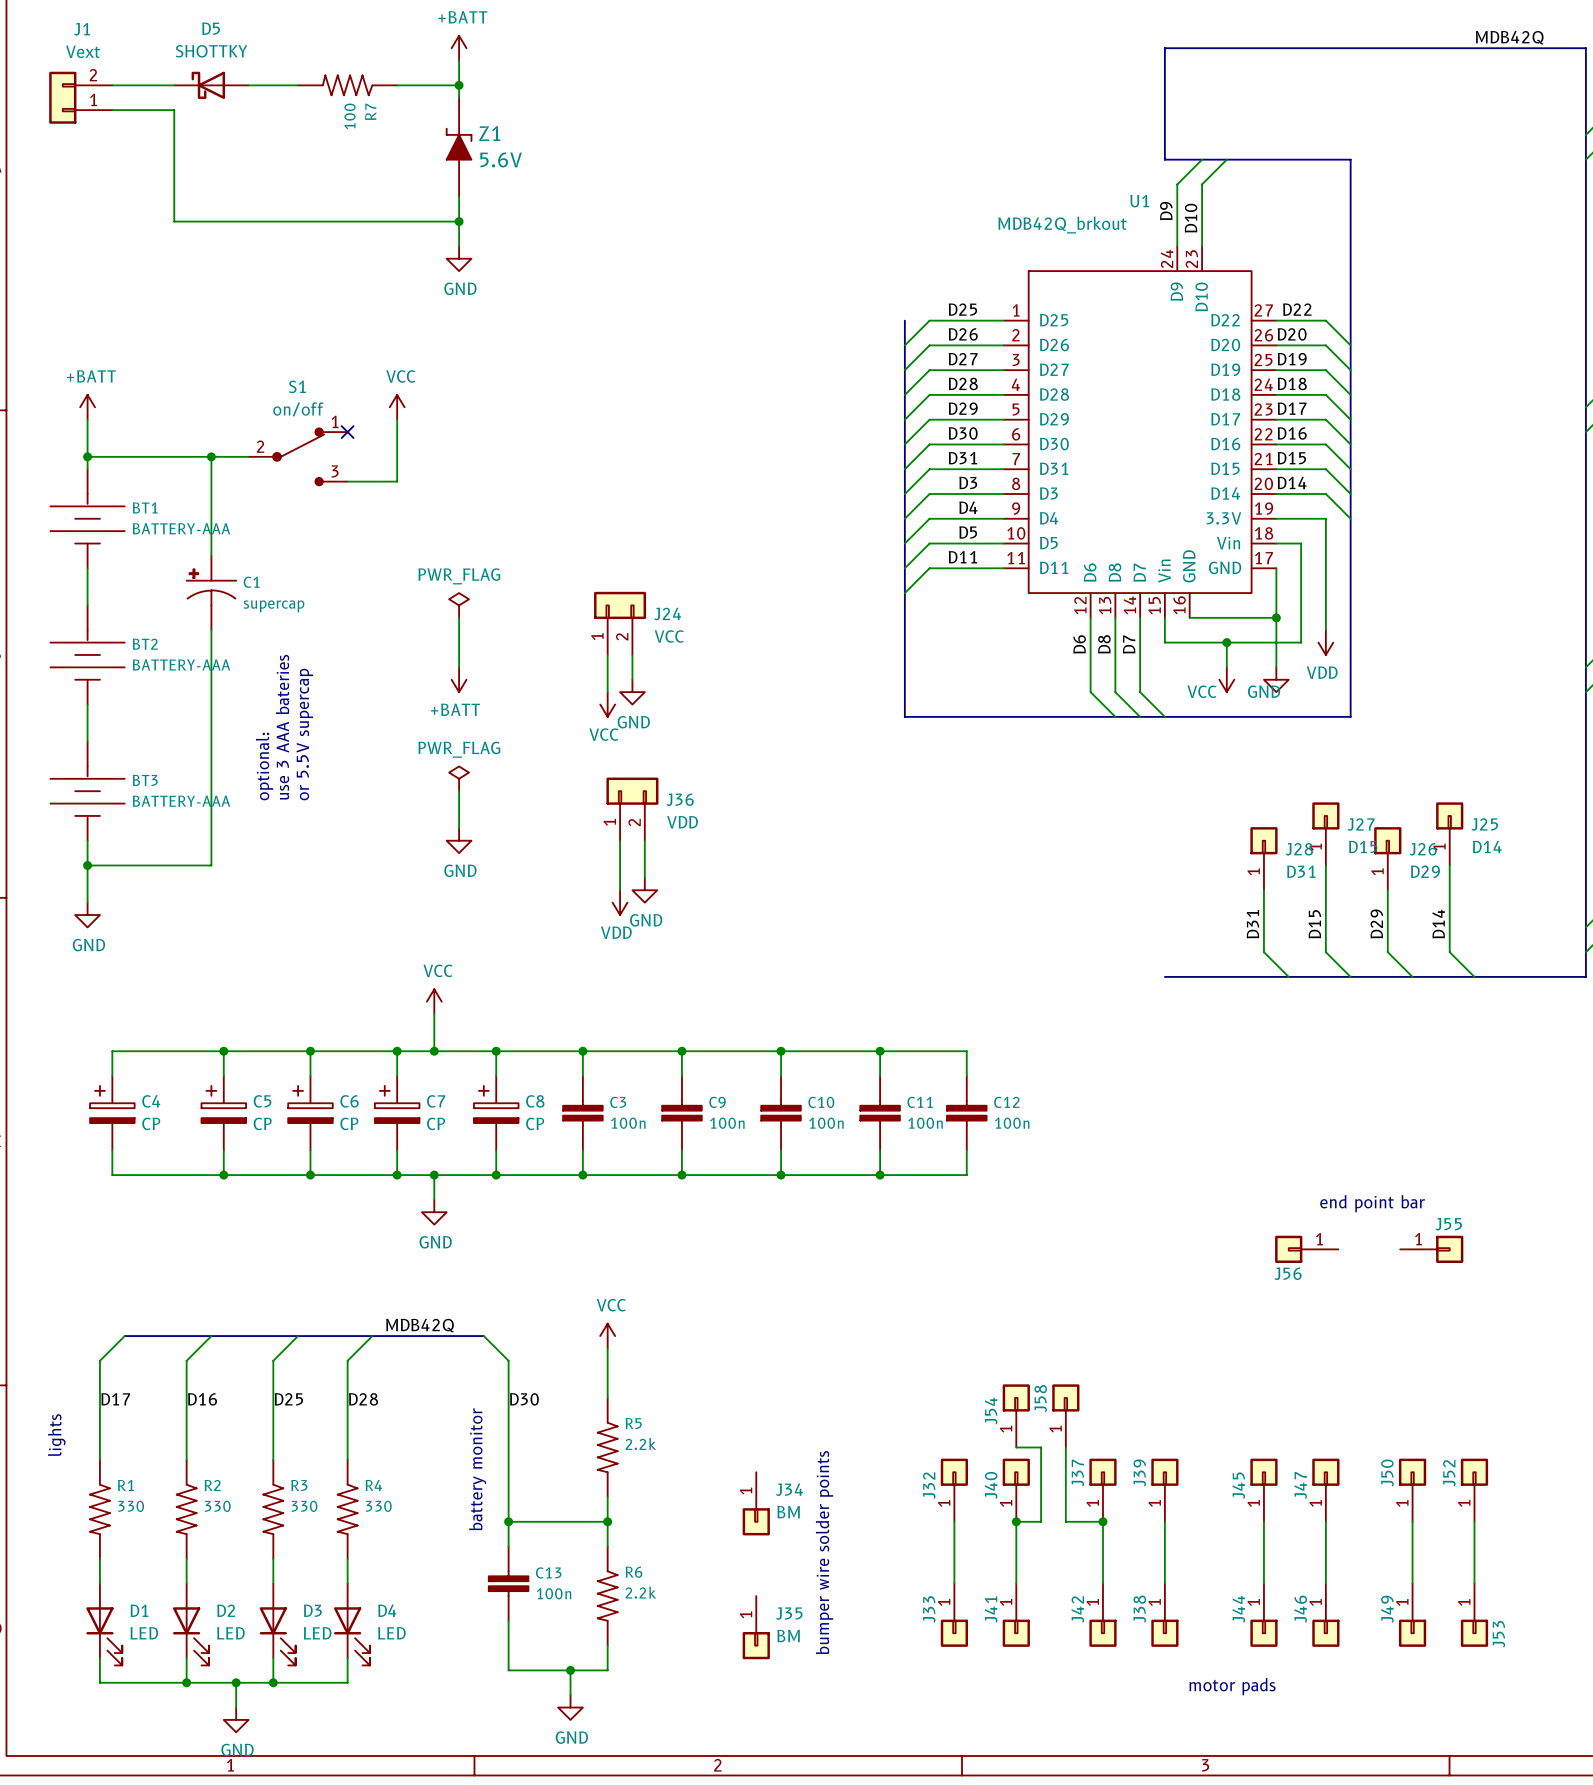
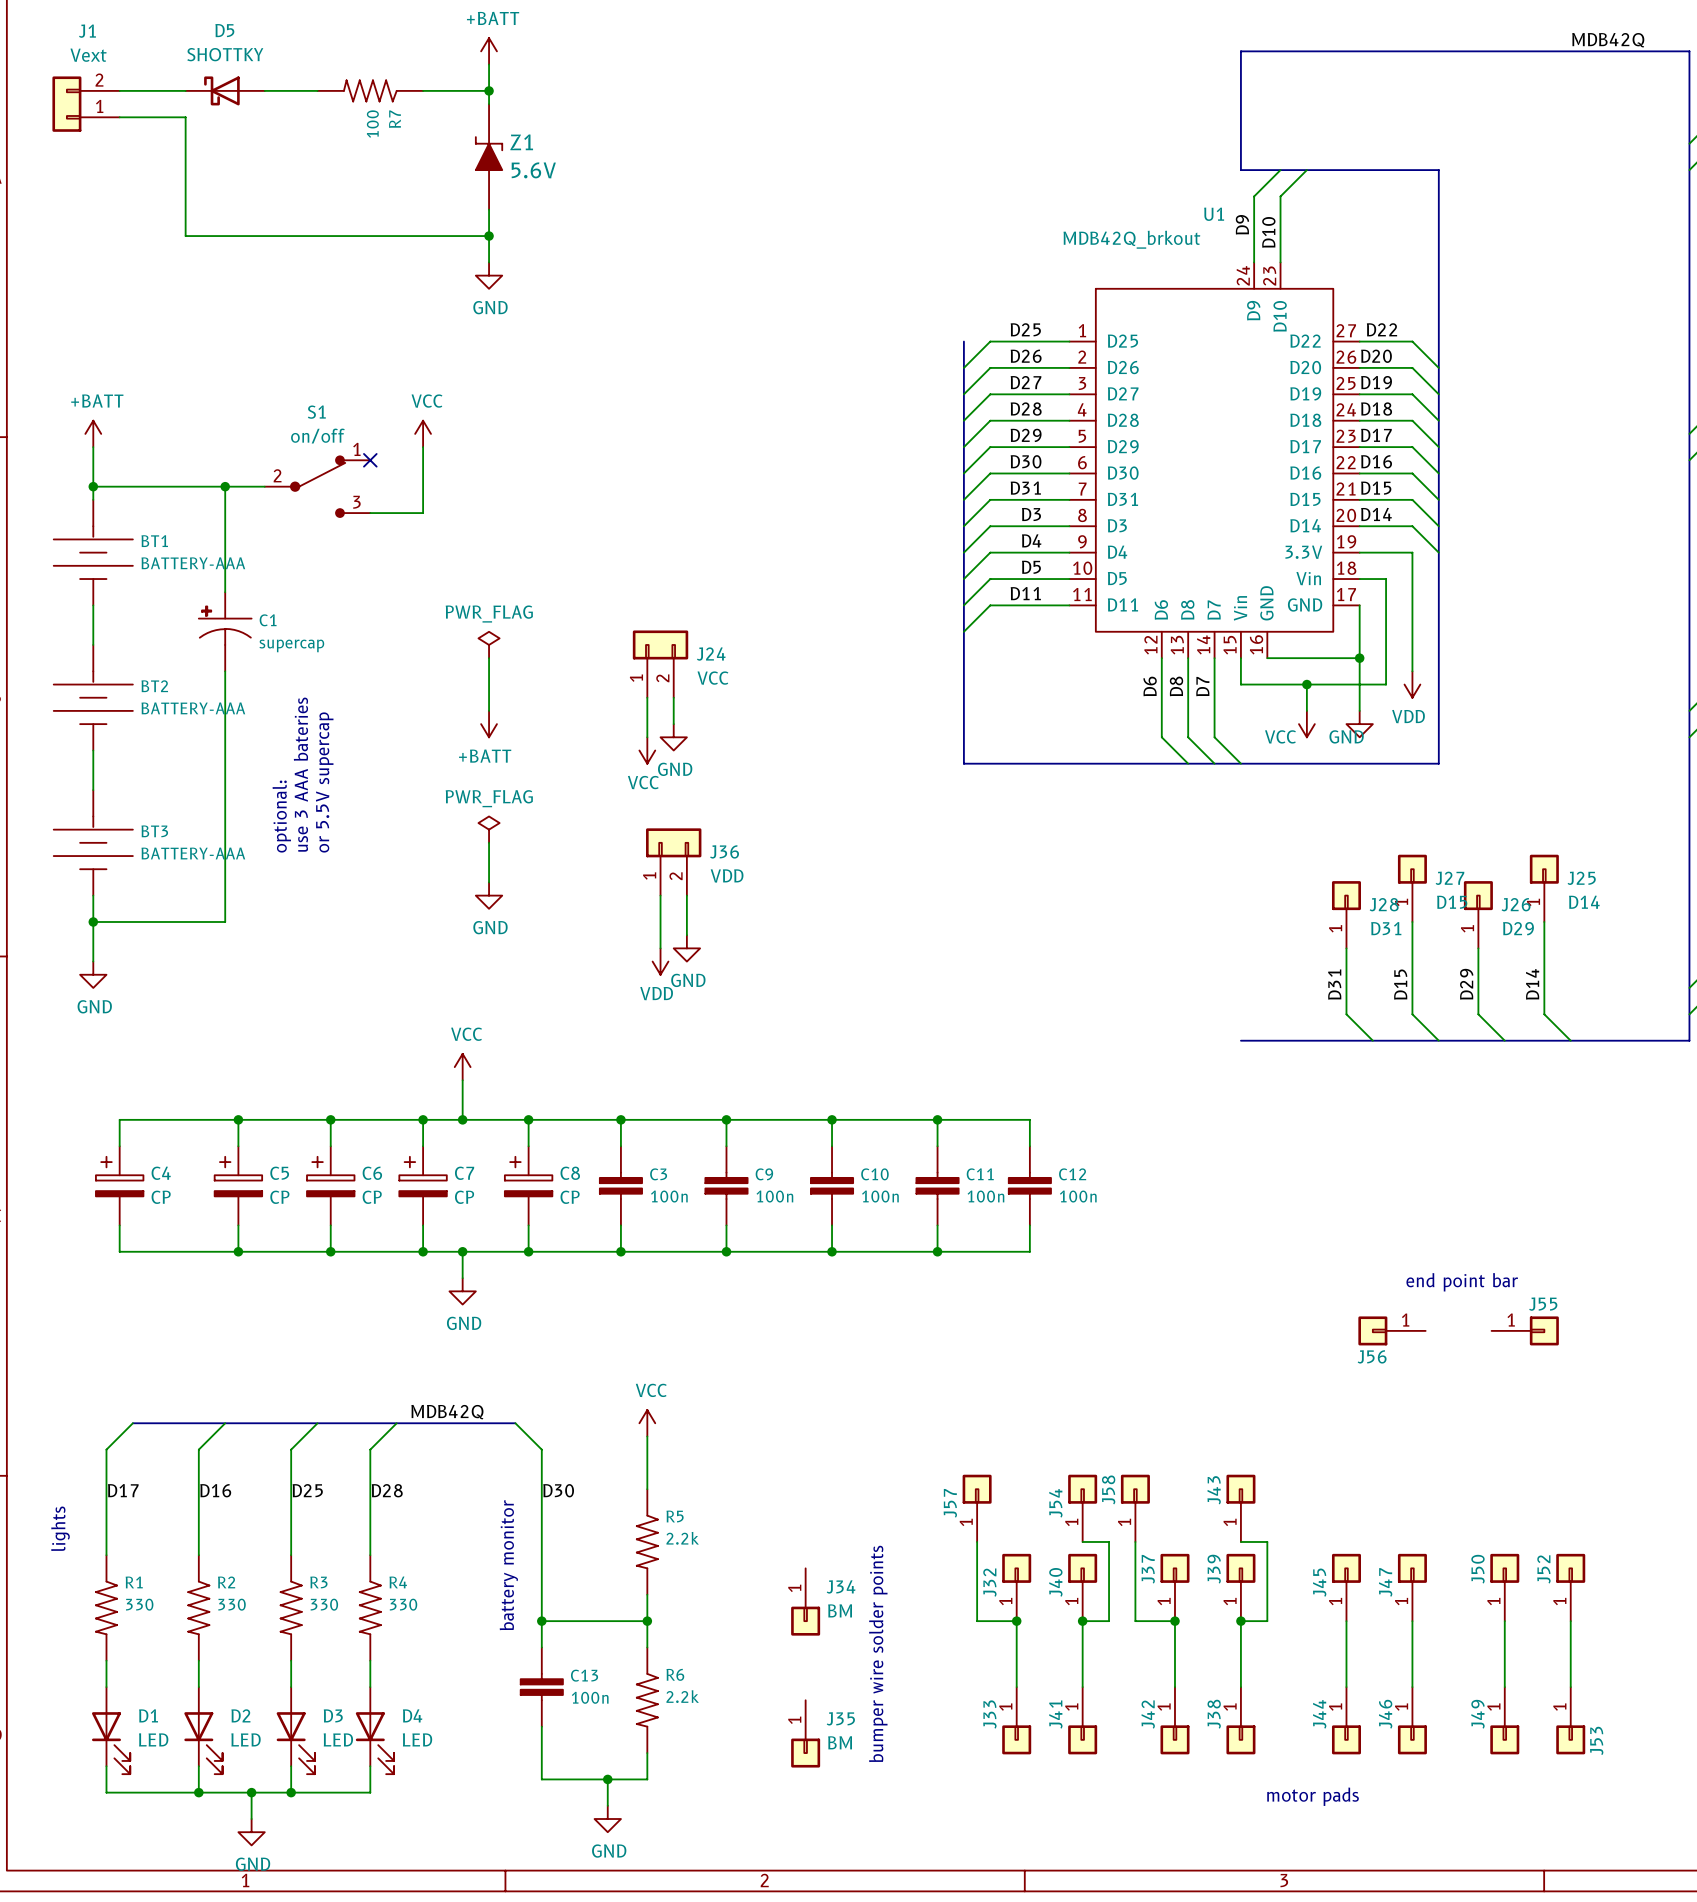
J57: none -> (977, 1508)
J43: none -> (1240, 1508)
wire: none -> (977, 1541) (977, 1621) (1016, 1621)
wire: none -> (1240, 1541) (1267, 1541) (1267, 1621) (1240, 1621)
junction: none -> (1016, 1621)
junction: none -> (1240, 1621)

